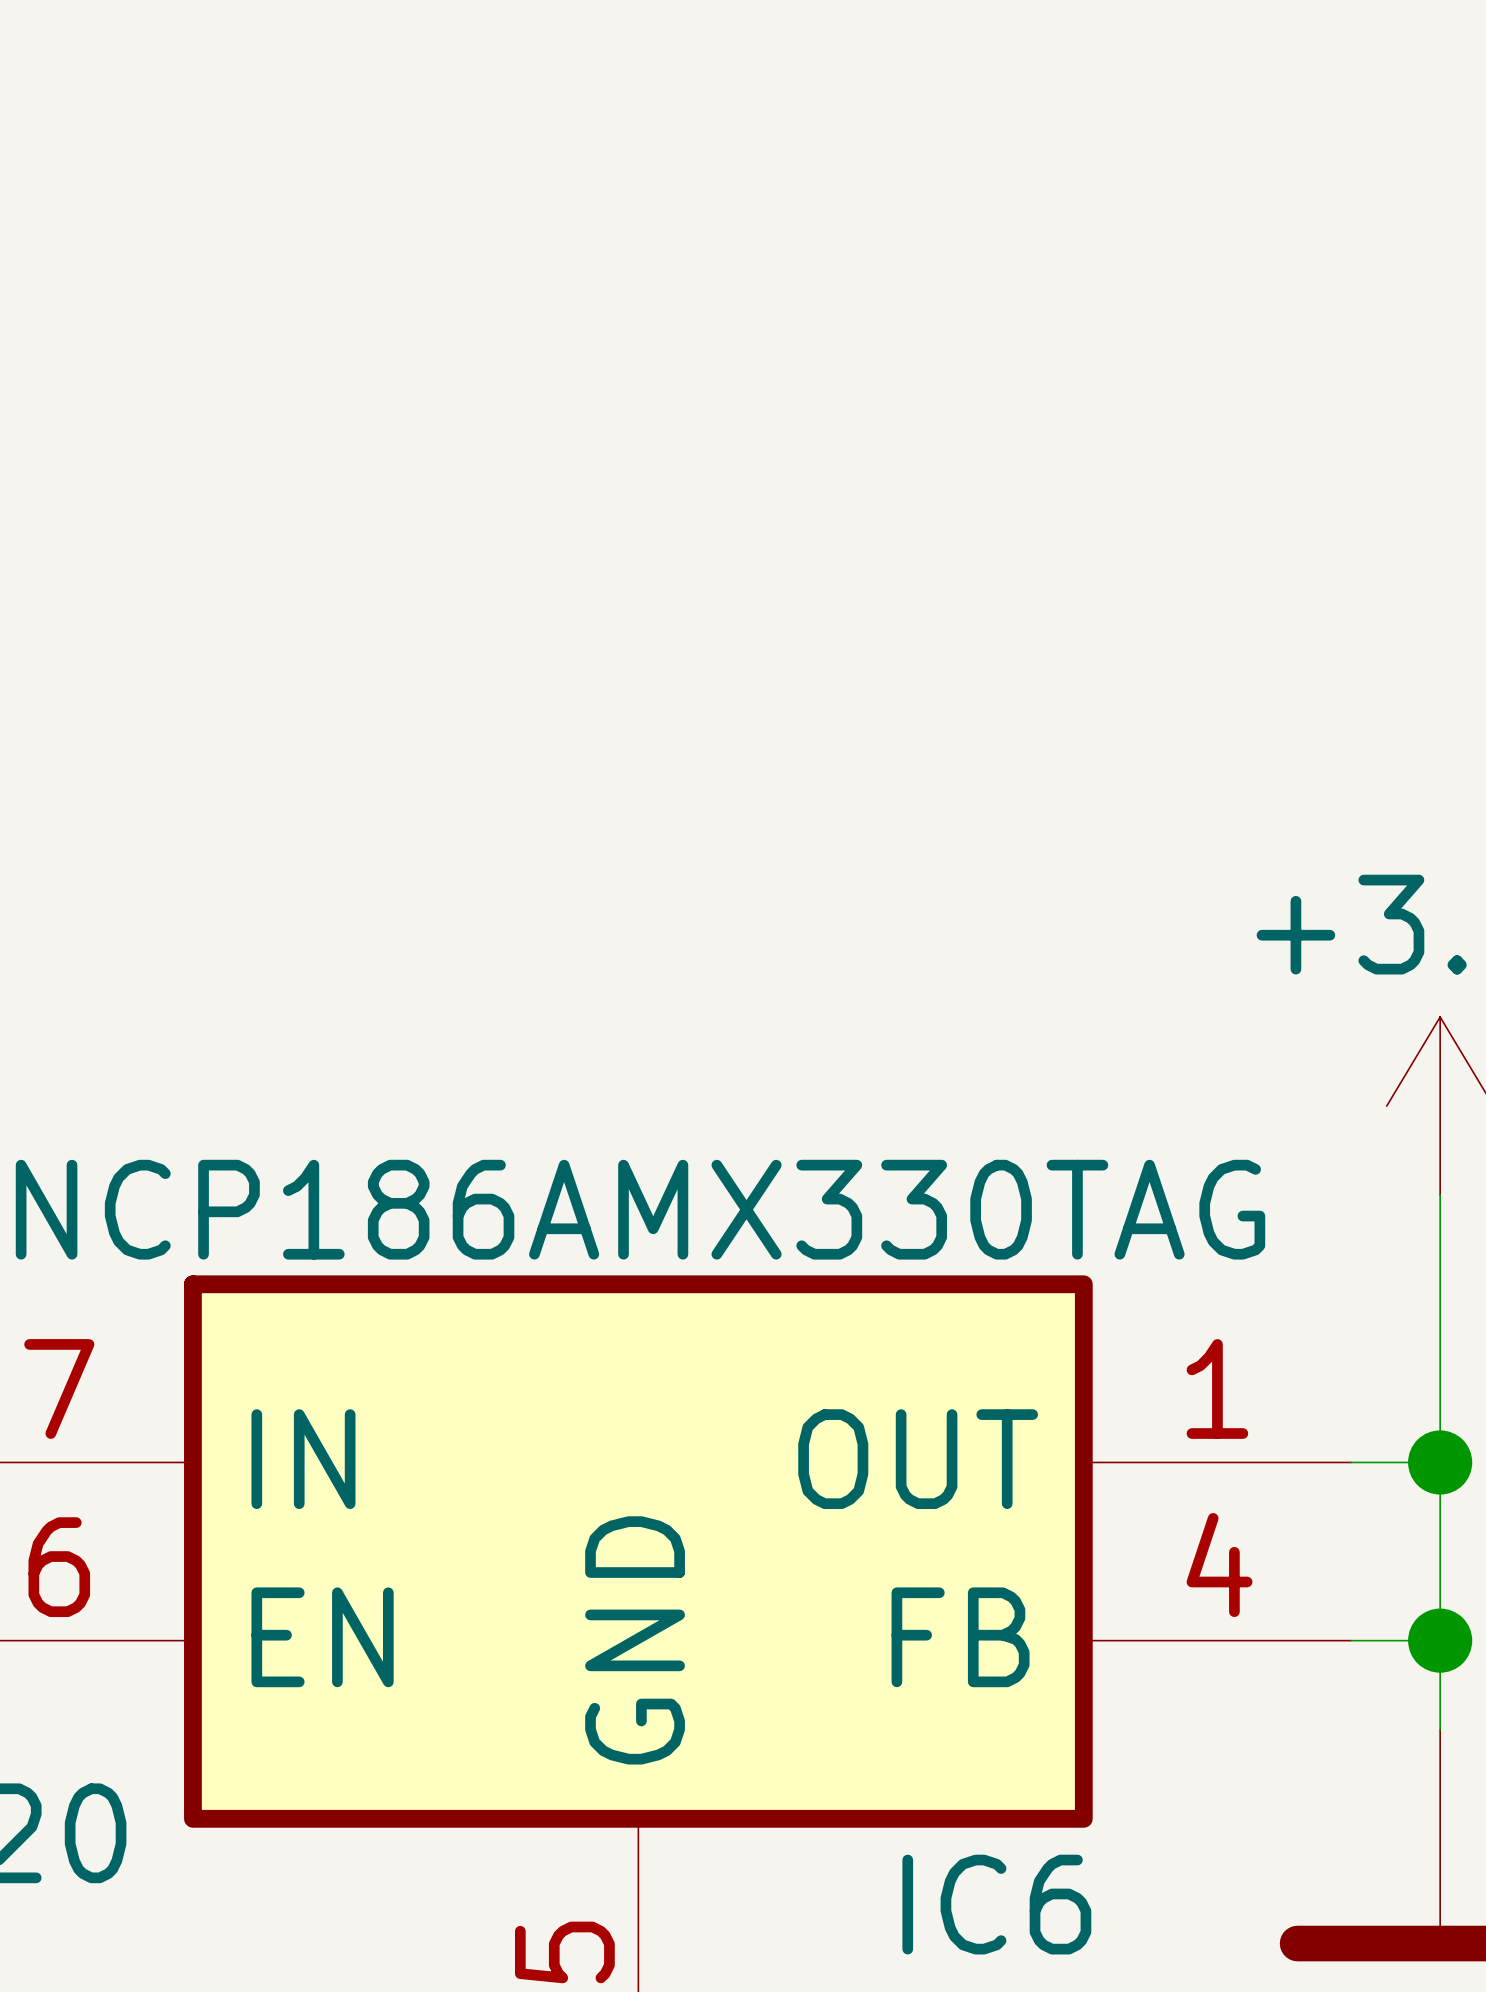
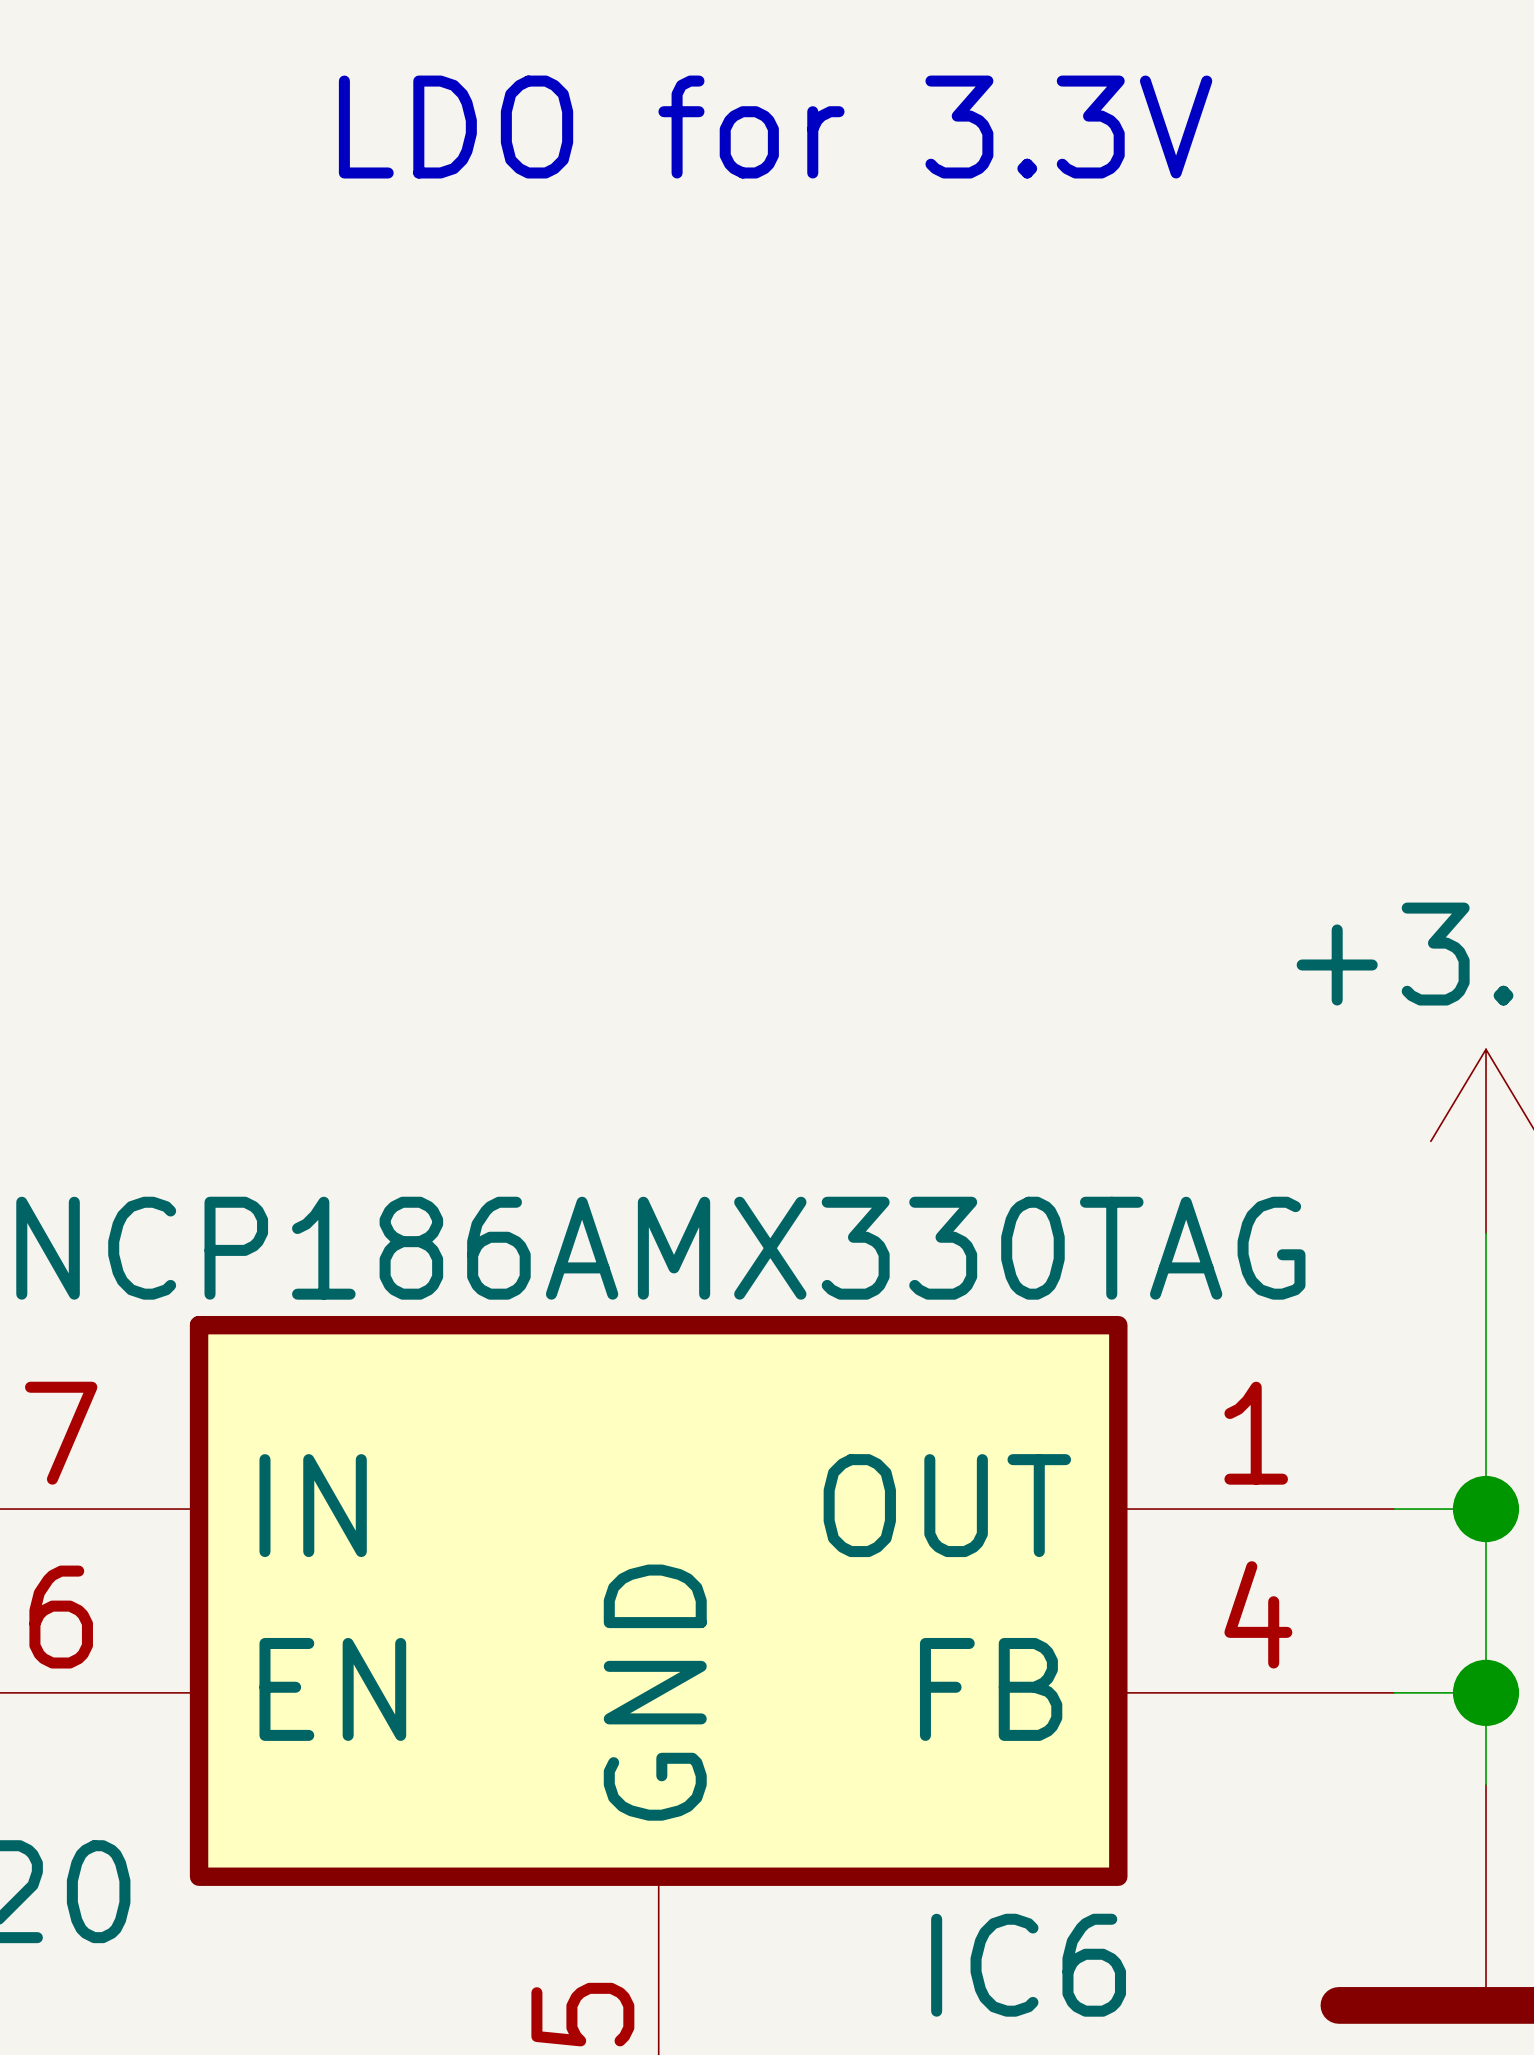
text: none -> LDO for 3.3V (775, 127)

